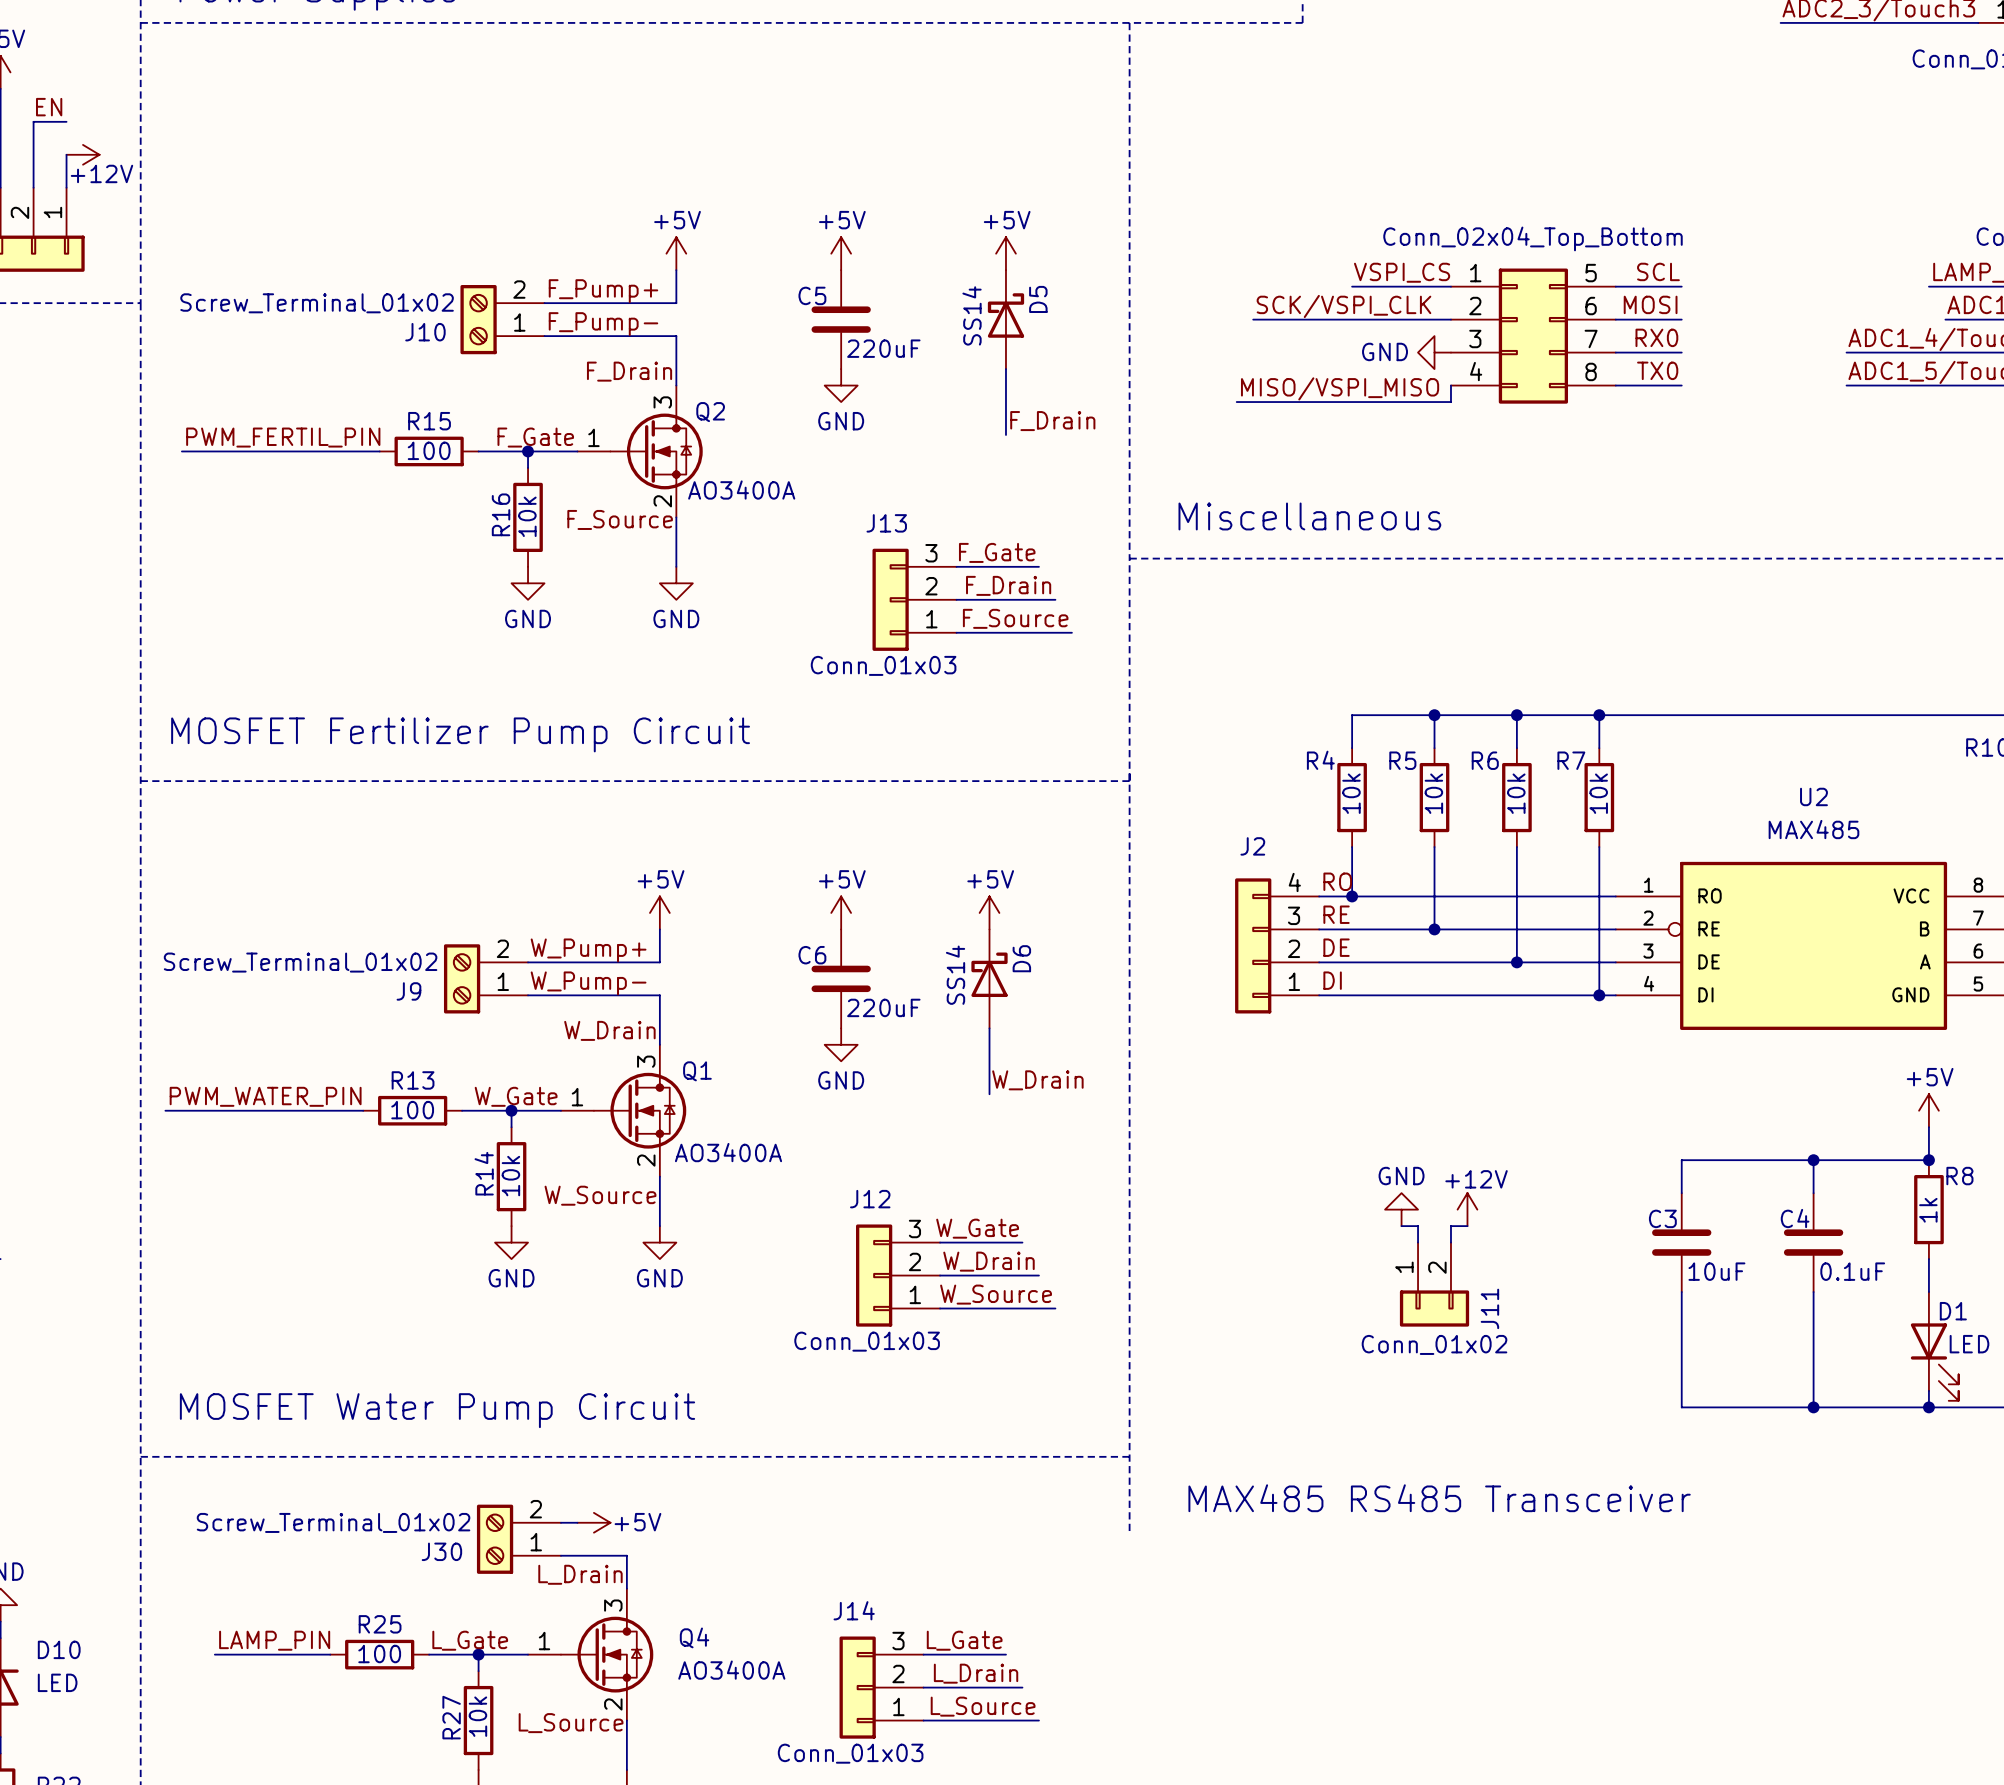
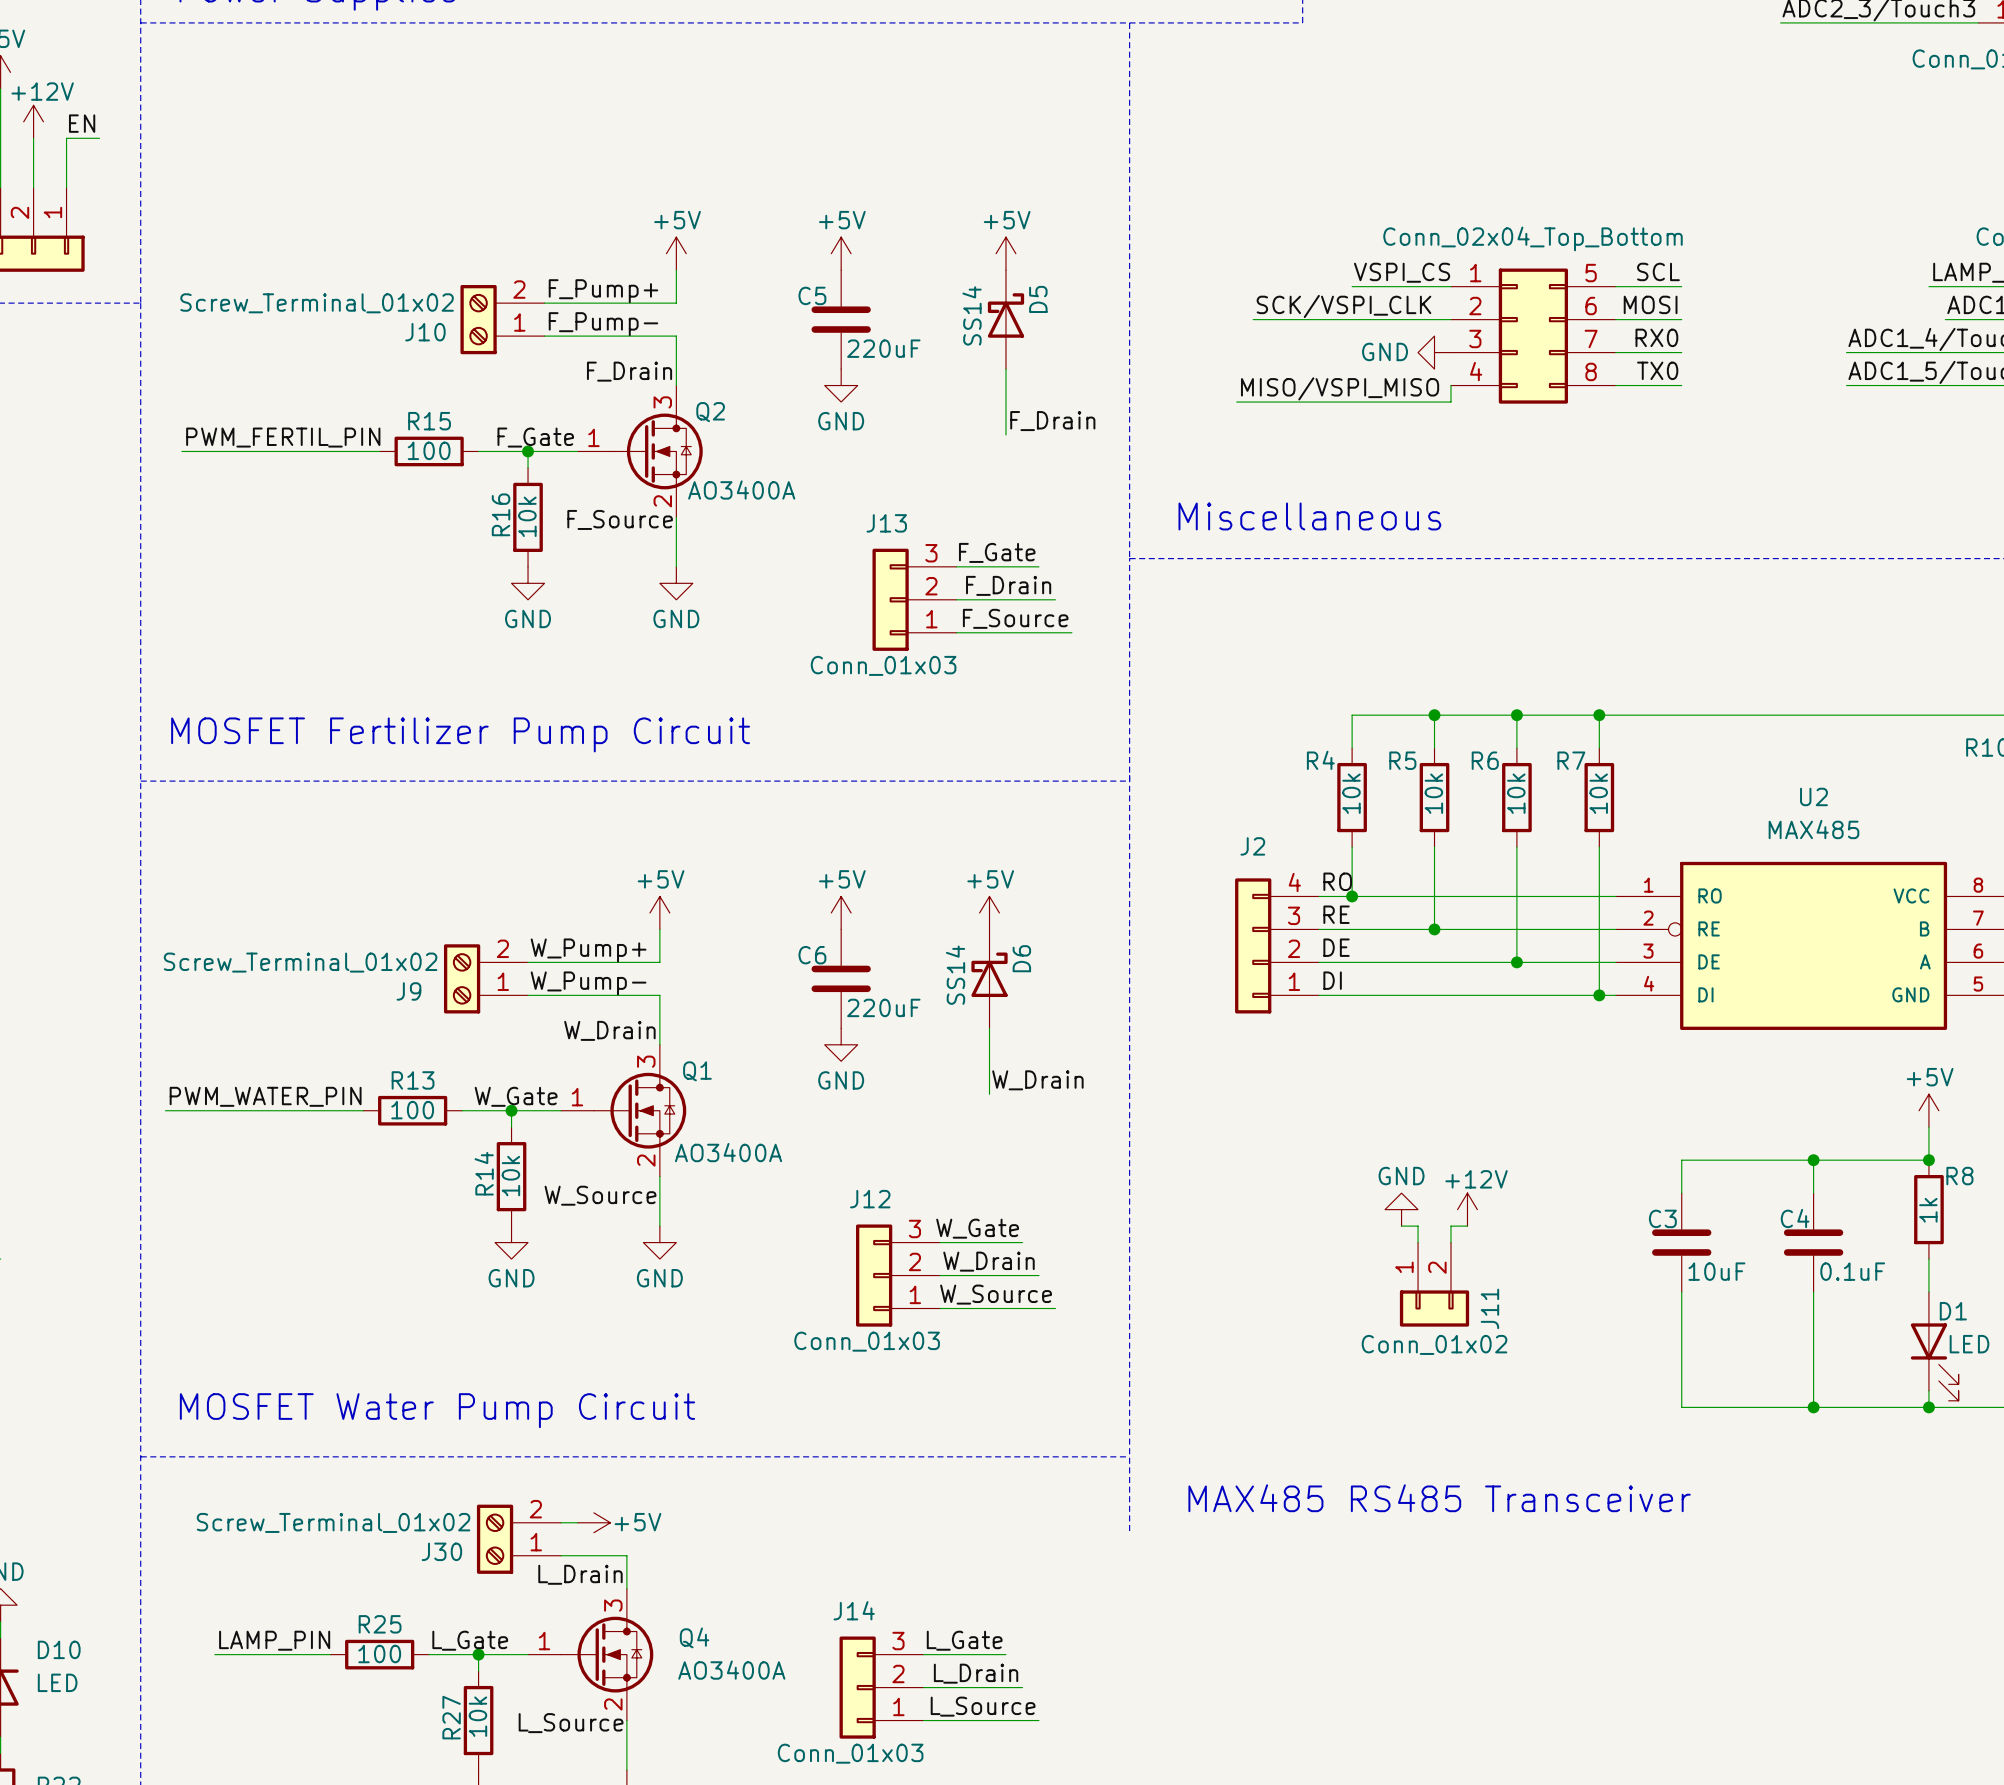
label position: EN (49, 107) -> EN (82, 123)
wire: (66, 121) (33, 121) (33, 138) -> (99, 138) (66, 138) (66, 154)
power symbol rotation: 0° (83, 154) -> 90° counterclockwise (33, 121)
power symbol position: +12V (83, 154) -> +12V (33, 121)

